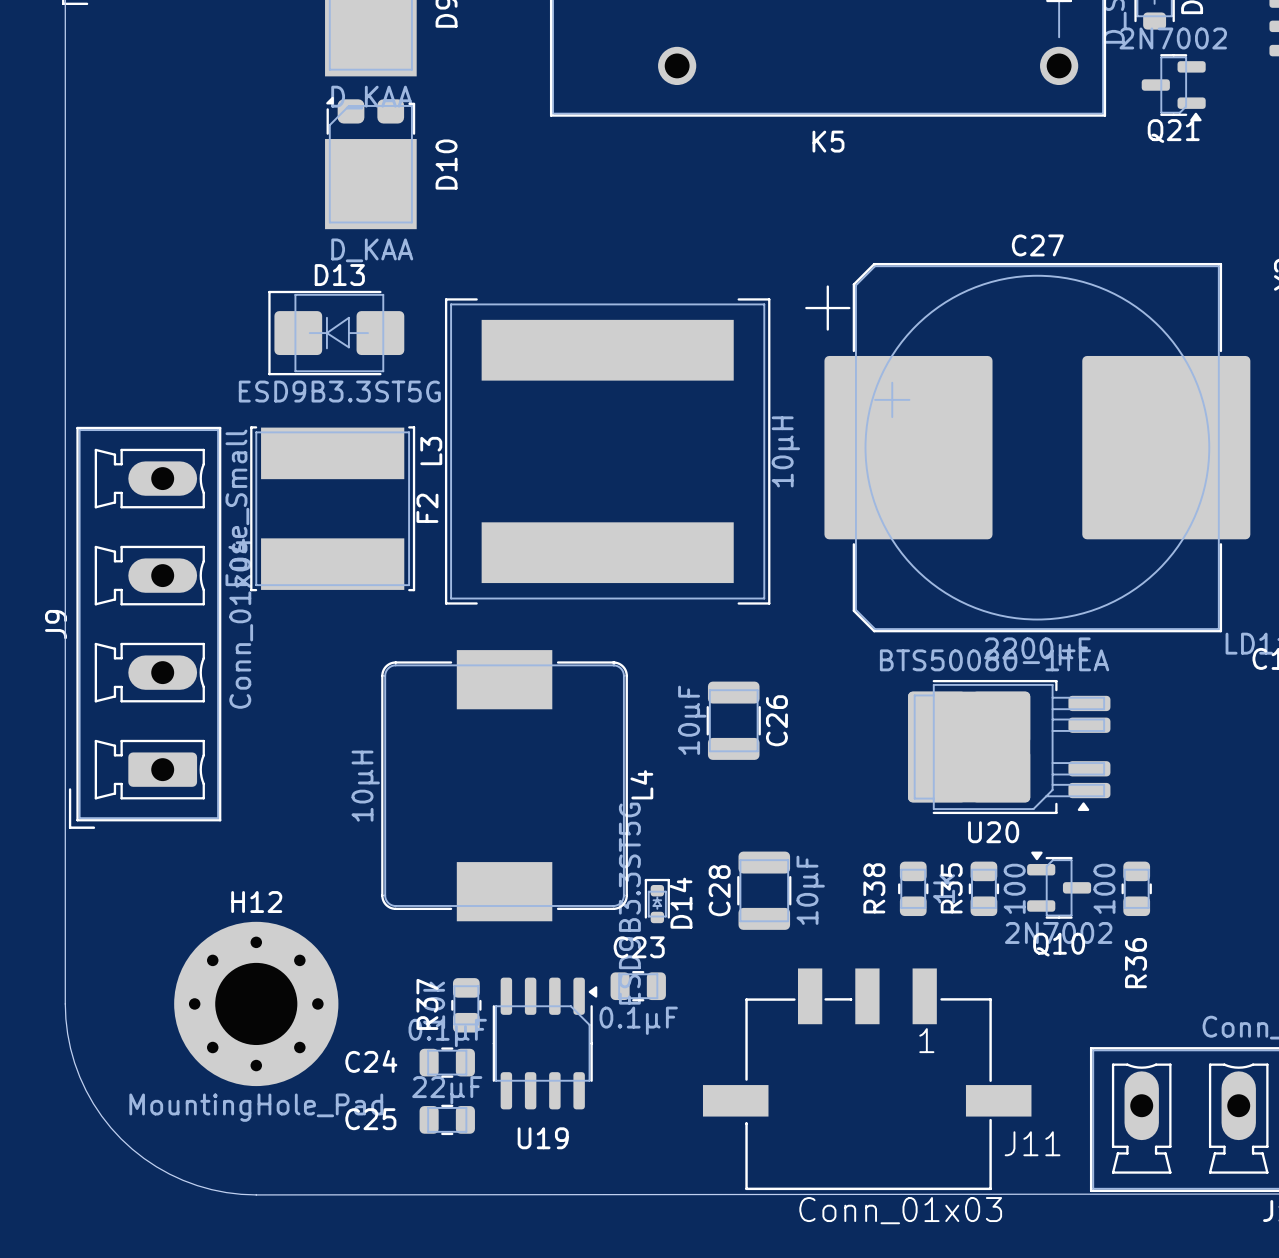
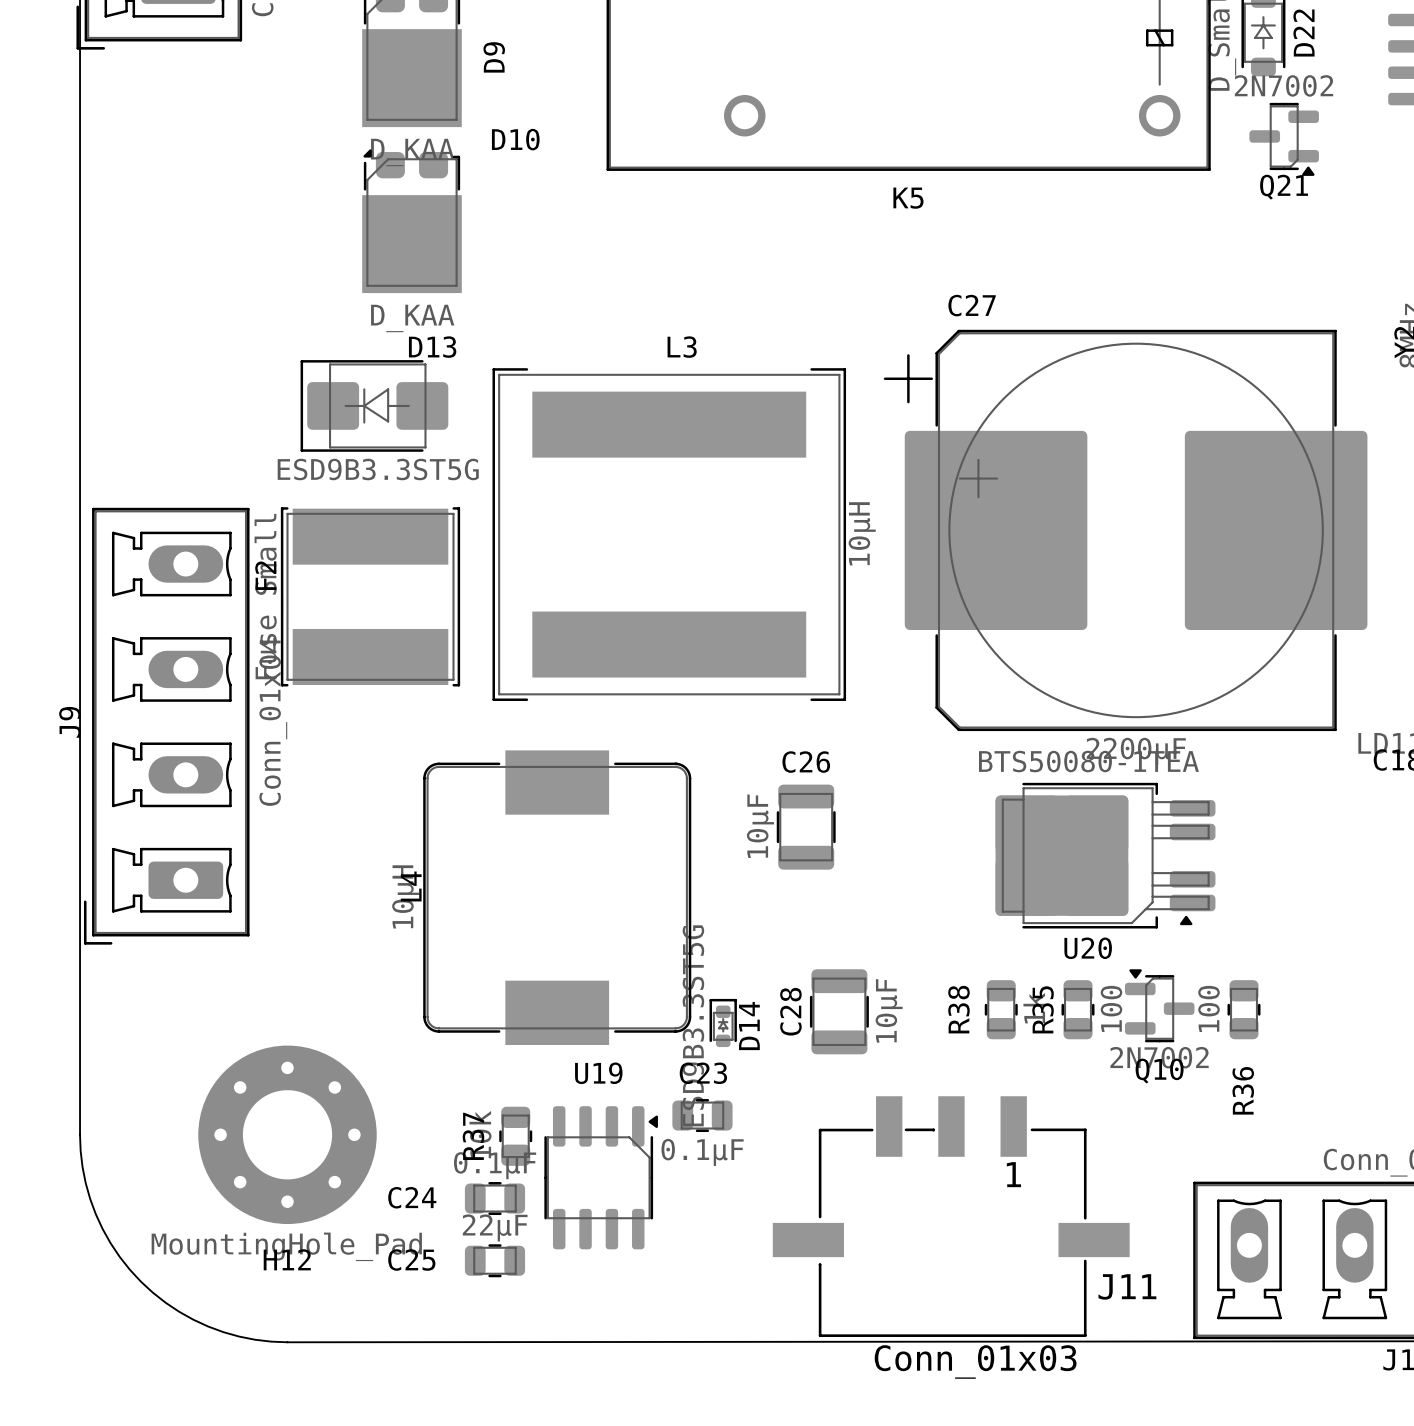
D10 name rotation: 0° (446, 164) -> 90° clockwise (515, 139)
D10 name position: D10 (446, 164) -> D10 (515, 139)
C27 name position: C27 (1037, 245) -> C27 (972, 305)
D13 name position: D13 (339, 275) -> D13 (432, 347)
L3 name rotation: 0° (431, 451) -> 90° clockwise (682, 347)
L3 name position: L3 (431, 451) -> L3 (682, 347)
F2 name position: F2 (427, 508) -> F2 (265, 575)
C26 name rotation: 0° (776, 720) -> 90° clockwise (806, 762)
C26 name position: C26 (776, 720) -> C26 (806, 762)
L4 name position: L4 (641, 784) -> L4 (411, 886)
H12 name position: H12 (256, 902) -> H12 (287, 1259)
U19 name position: U19 (543, 1138) -> U19 (598, 1073)

